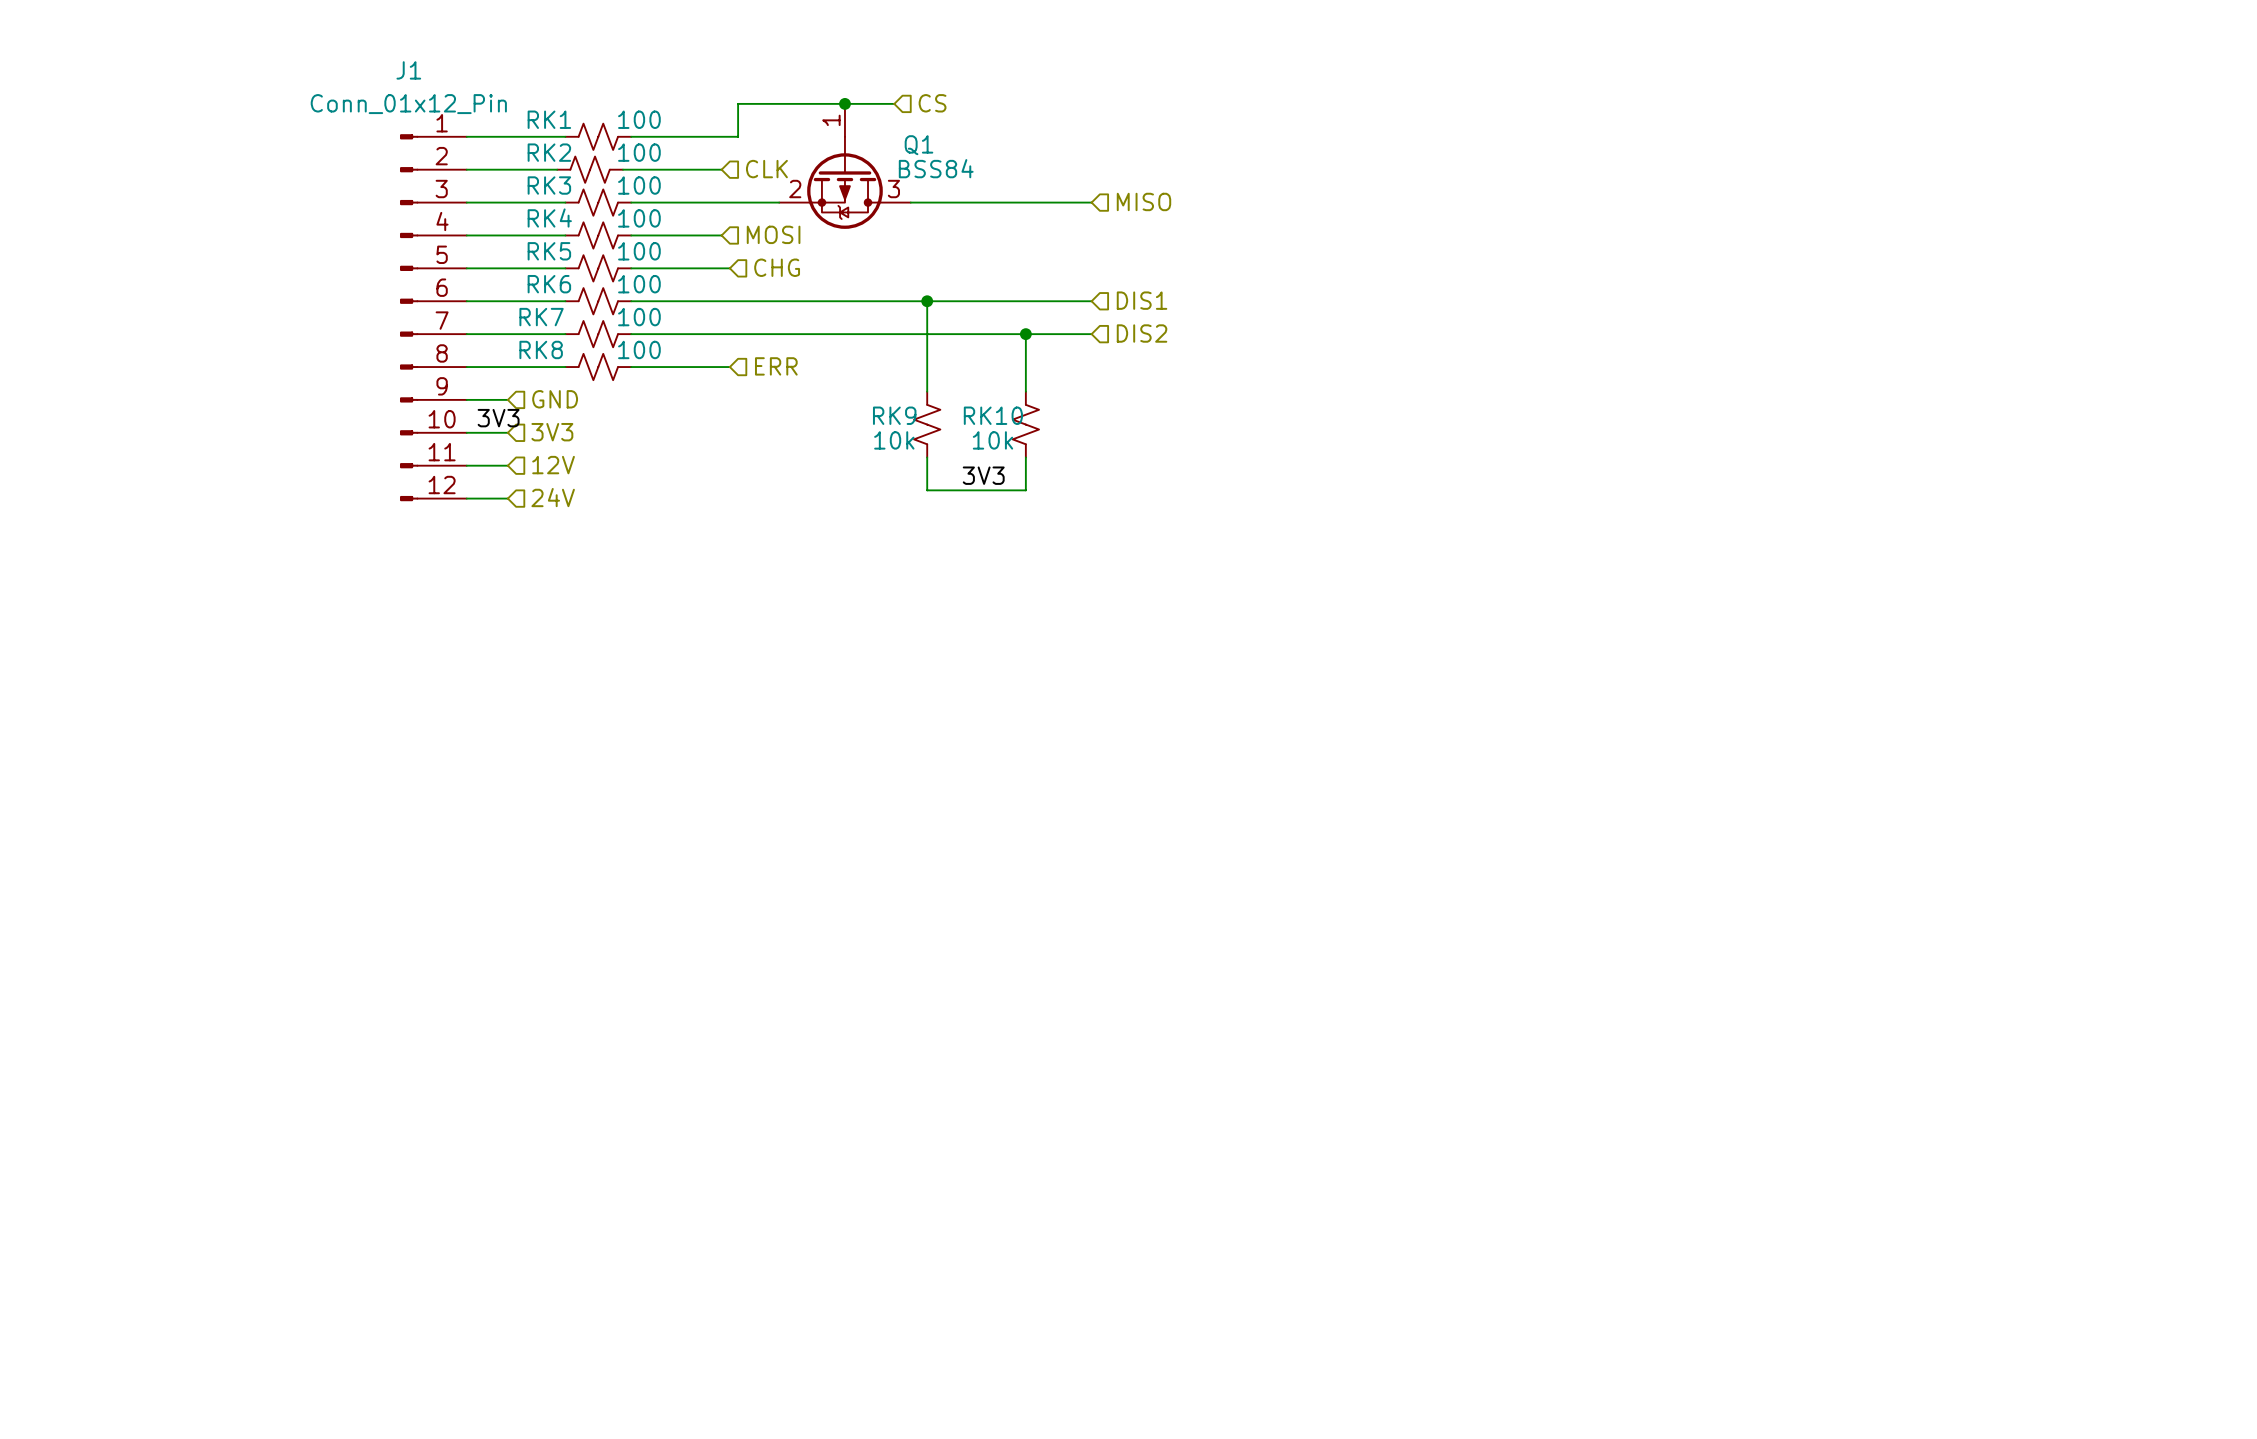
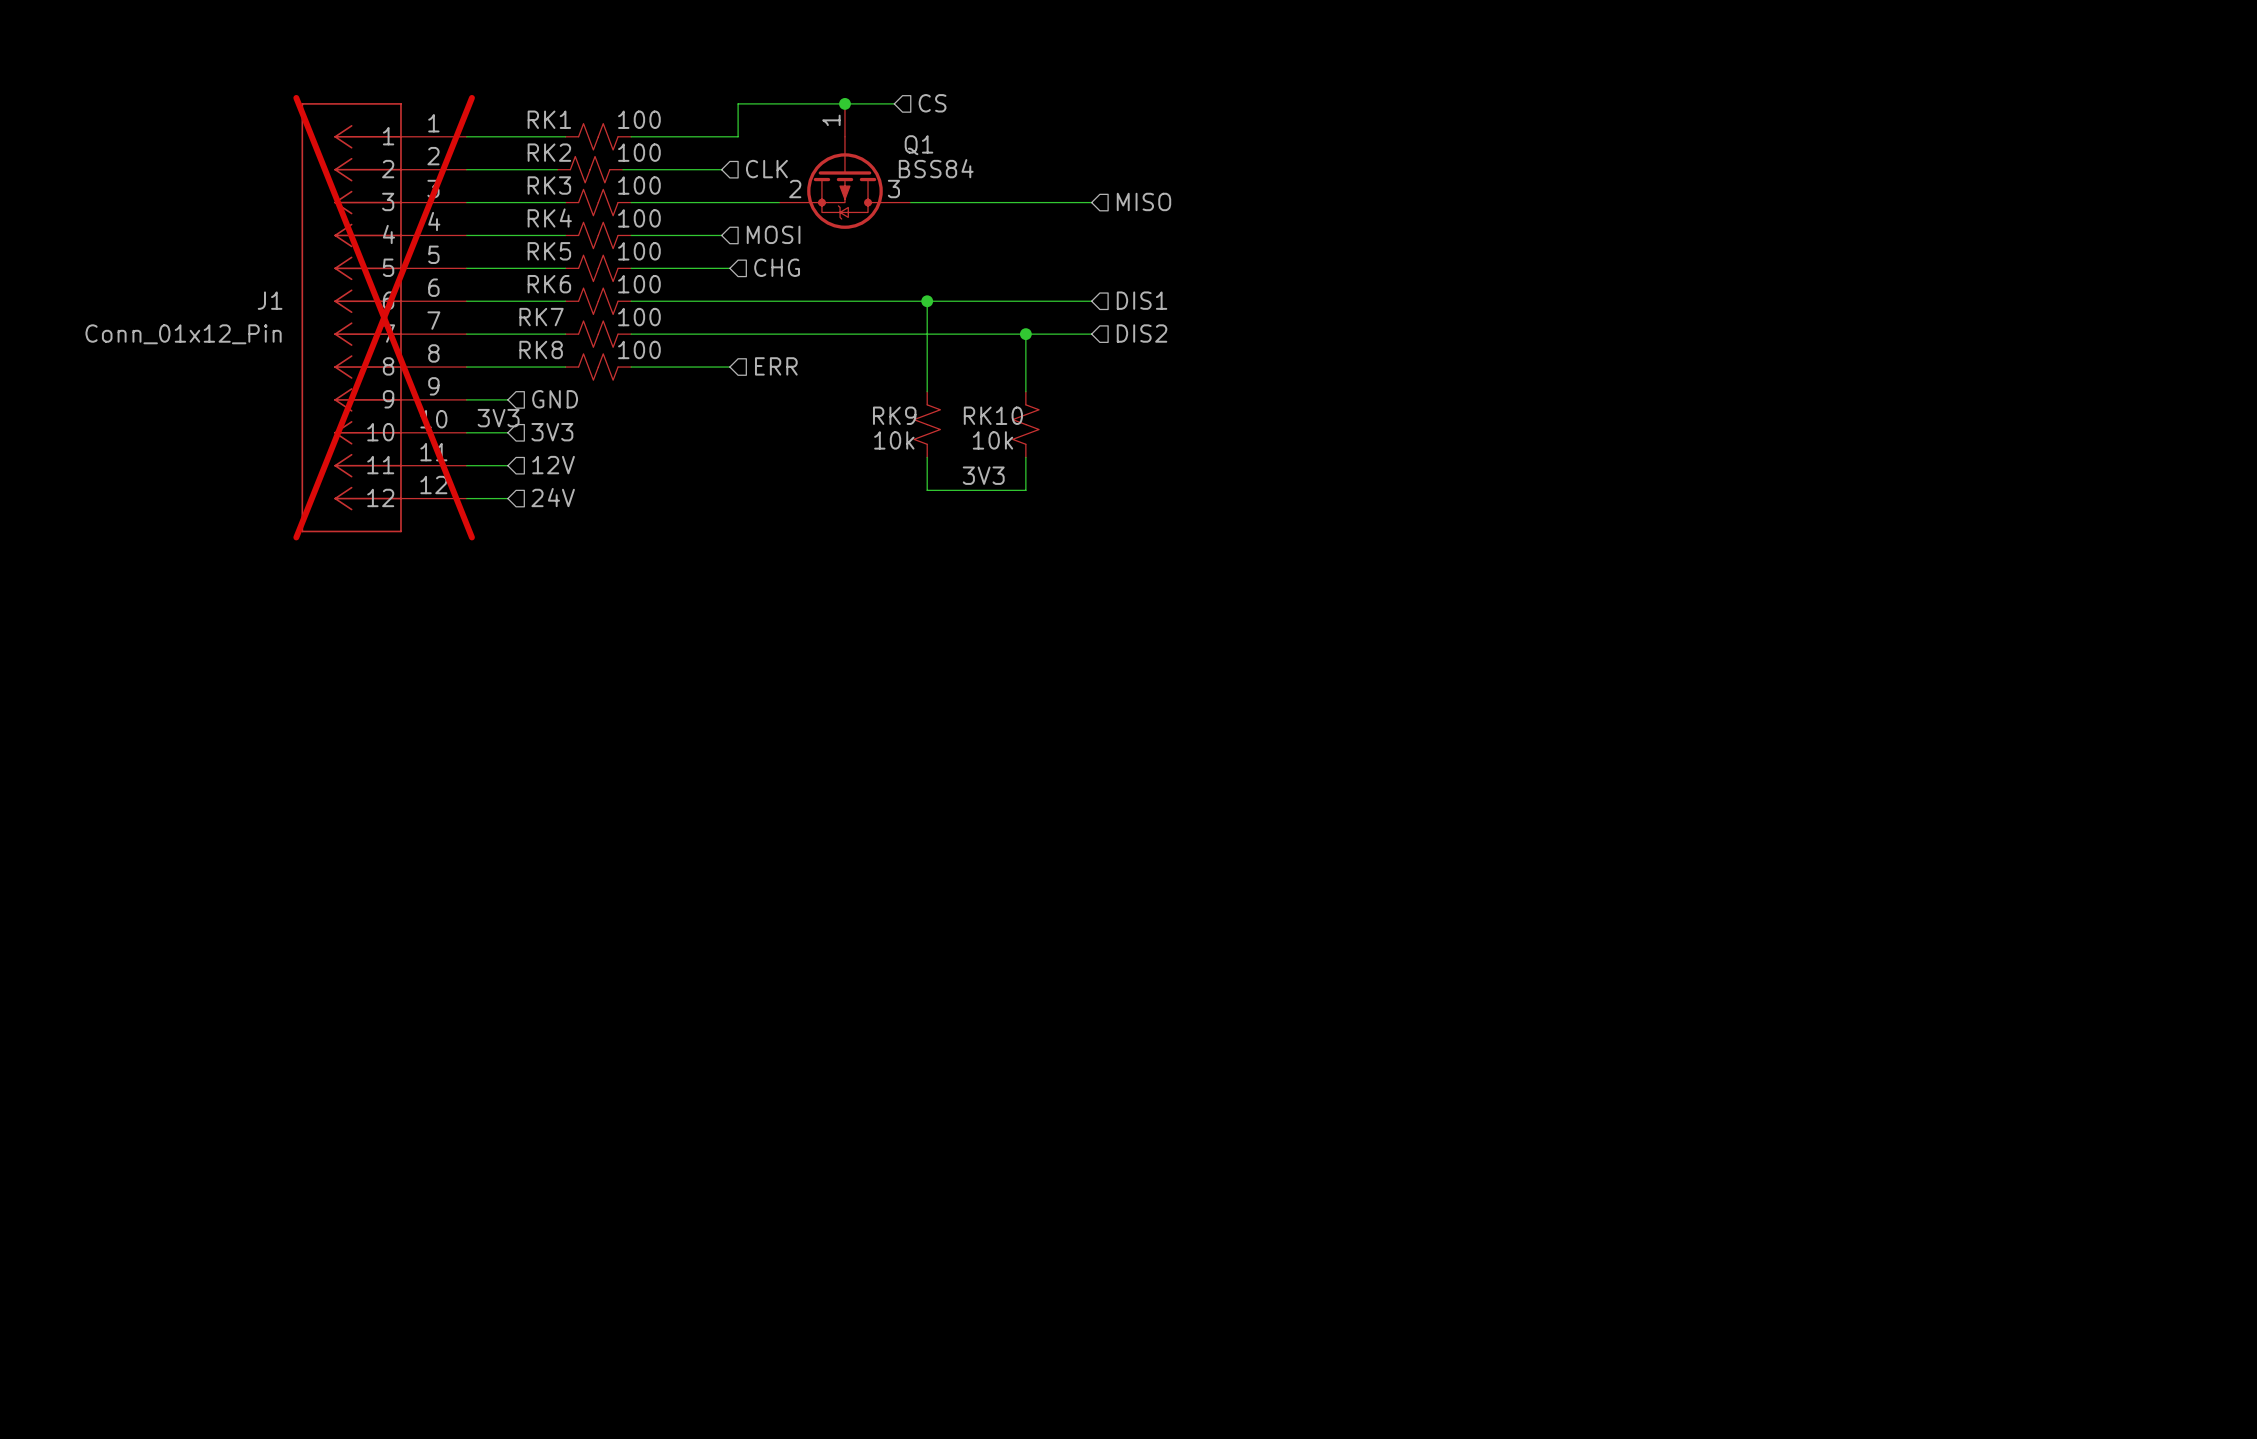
J1 name position: J1 (408, 70) -> J1 (270, 300)
J1 value position: Conn_01x12_Pin (408, 104) -> Conn_01x12_Pin (183, 334)
J1 symbol: [399, 134, 467, 502] -> [301, 103, 467, 533]
J1 do-not-place cross: none -> (384, 317)

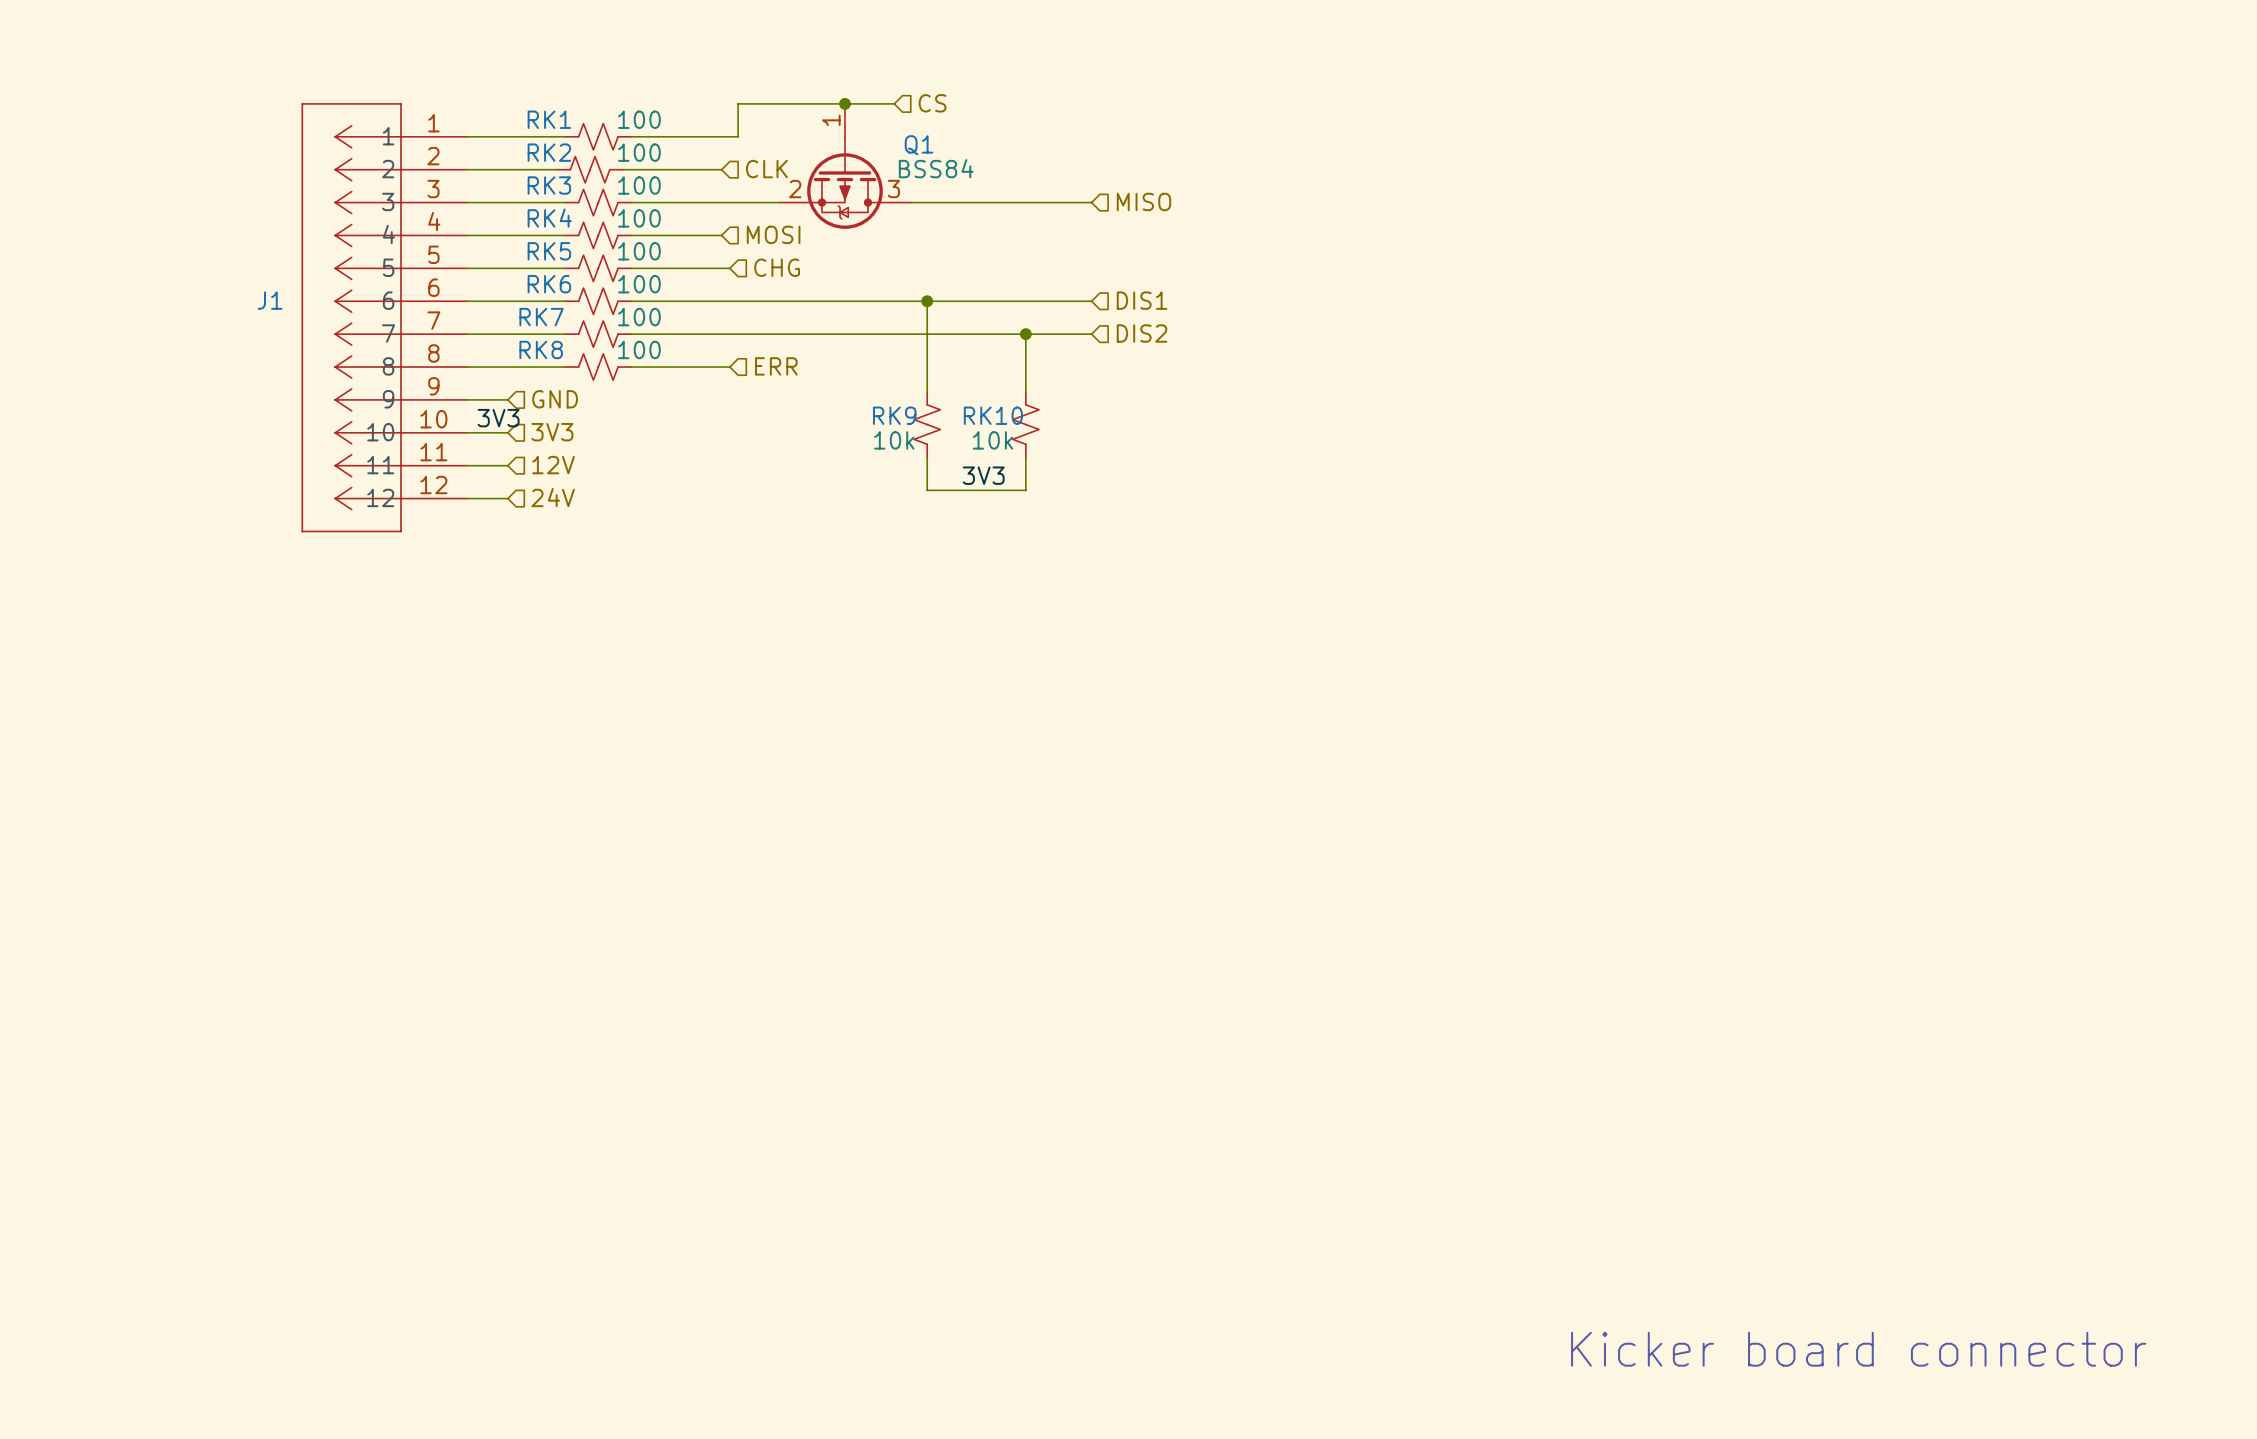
J1 do-not-place cross: (384, 317) -> none
J1 value: Conn_01x12_Pin (183, 334) -> none
text: none -> Kicker board connector (1858, 1349)

